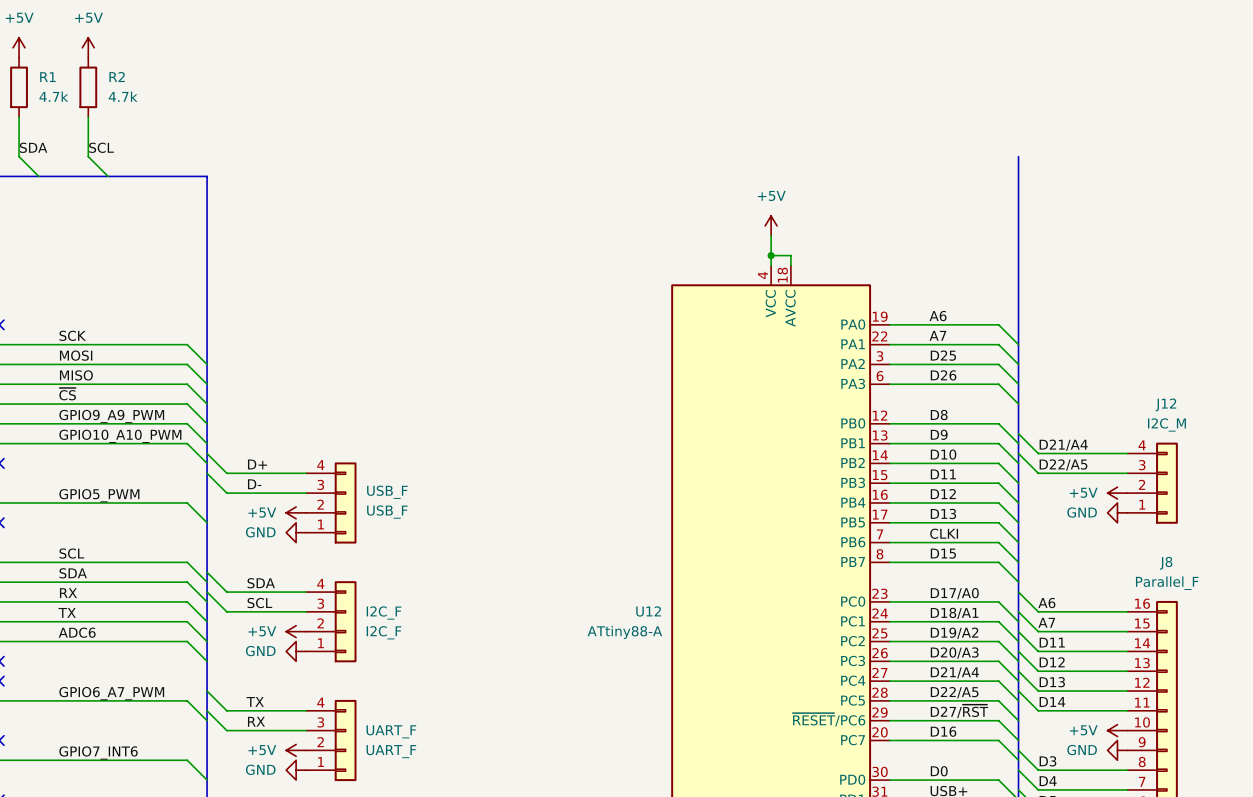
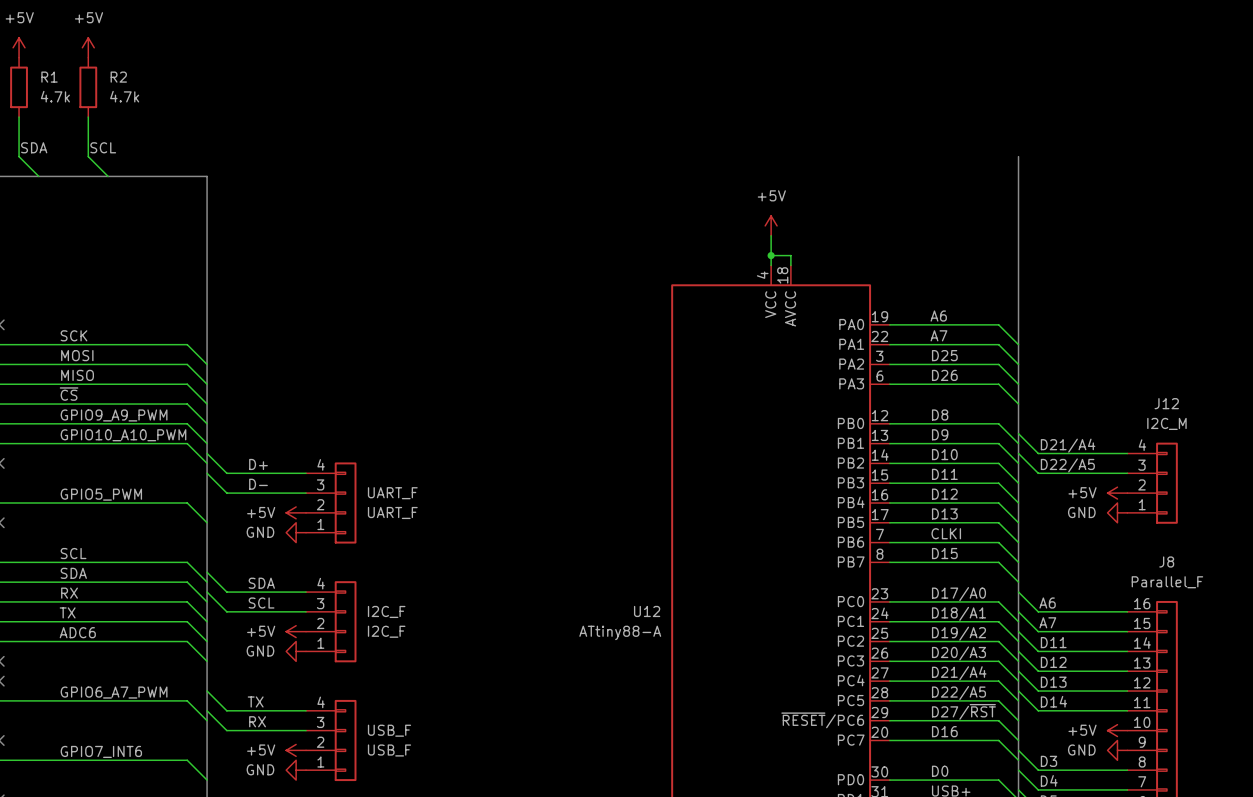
USB_F name: USB_F (387, 492) -> UART_F (392, 512)
USB_F value: USB_F (387, 512) -> UART_F (392, 493)
UART_F value: UART_F (391, 731) -> USB_F (389, 730)
UART_F name: UART_F (391, 751) -> USB_F (389, 750)

